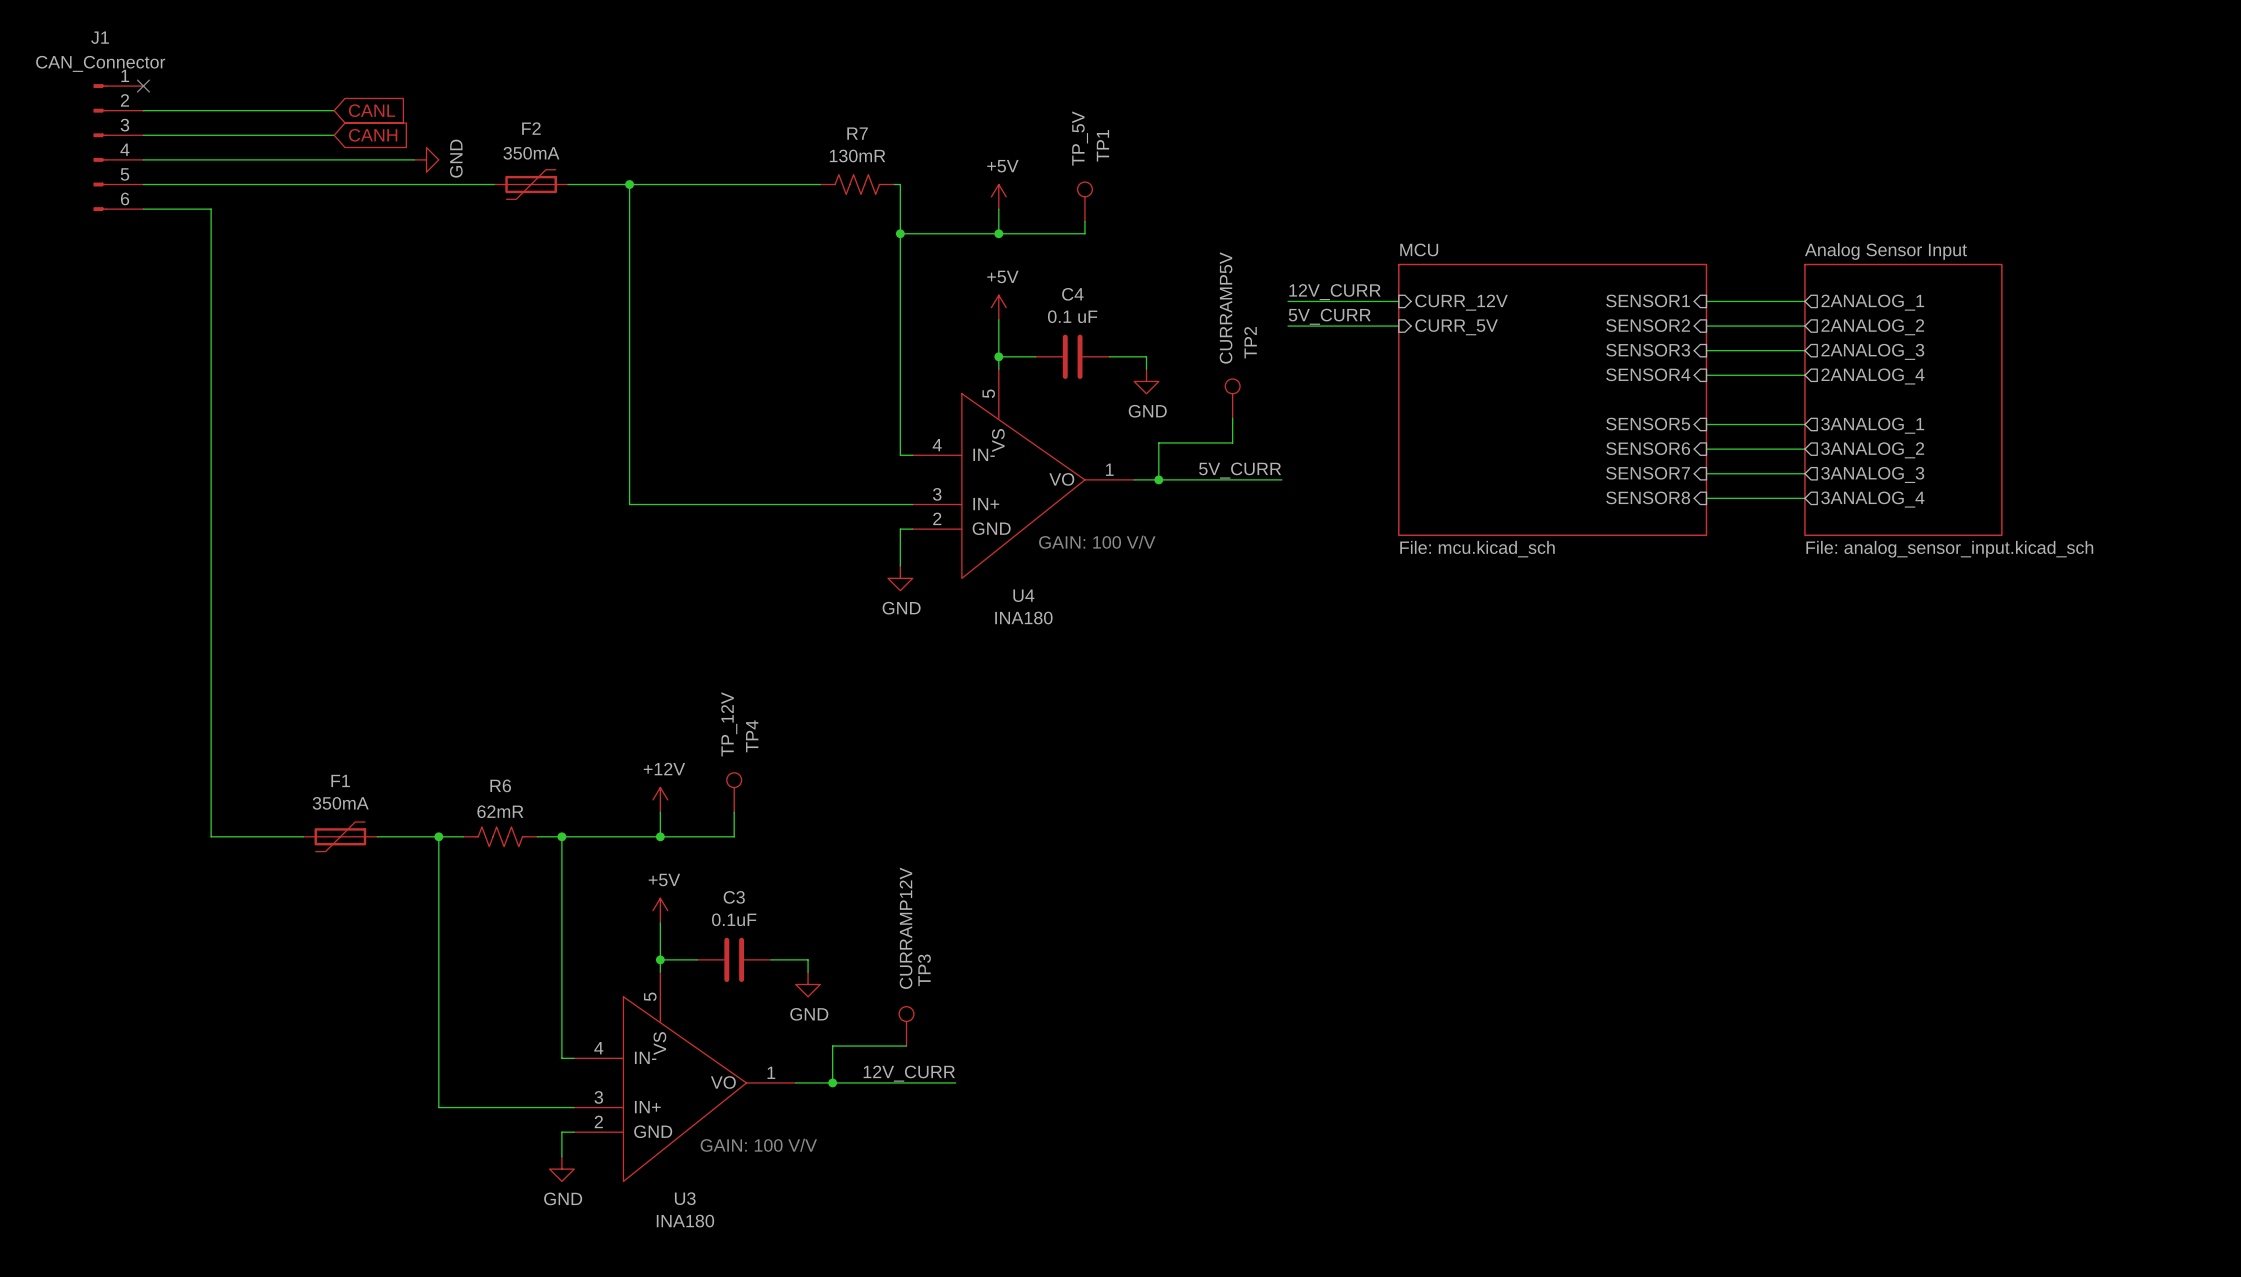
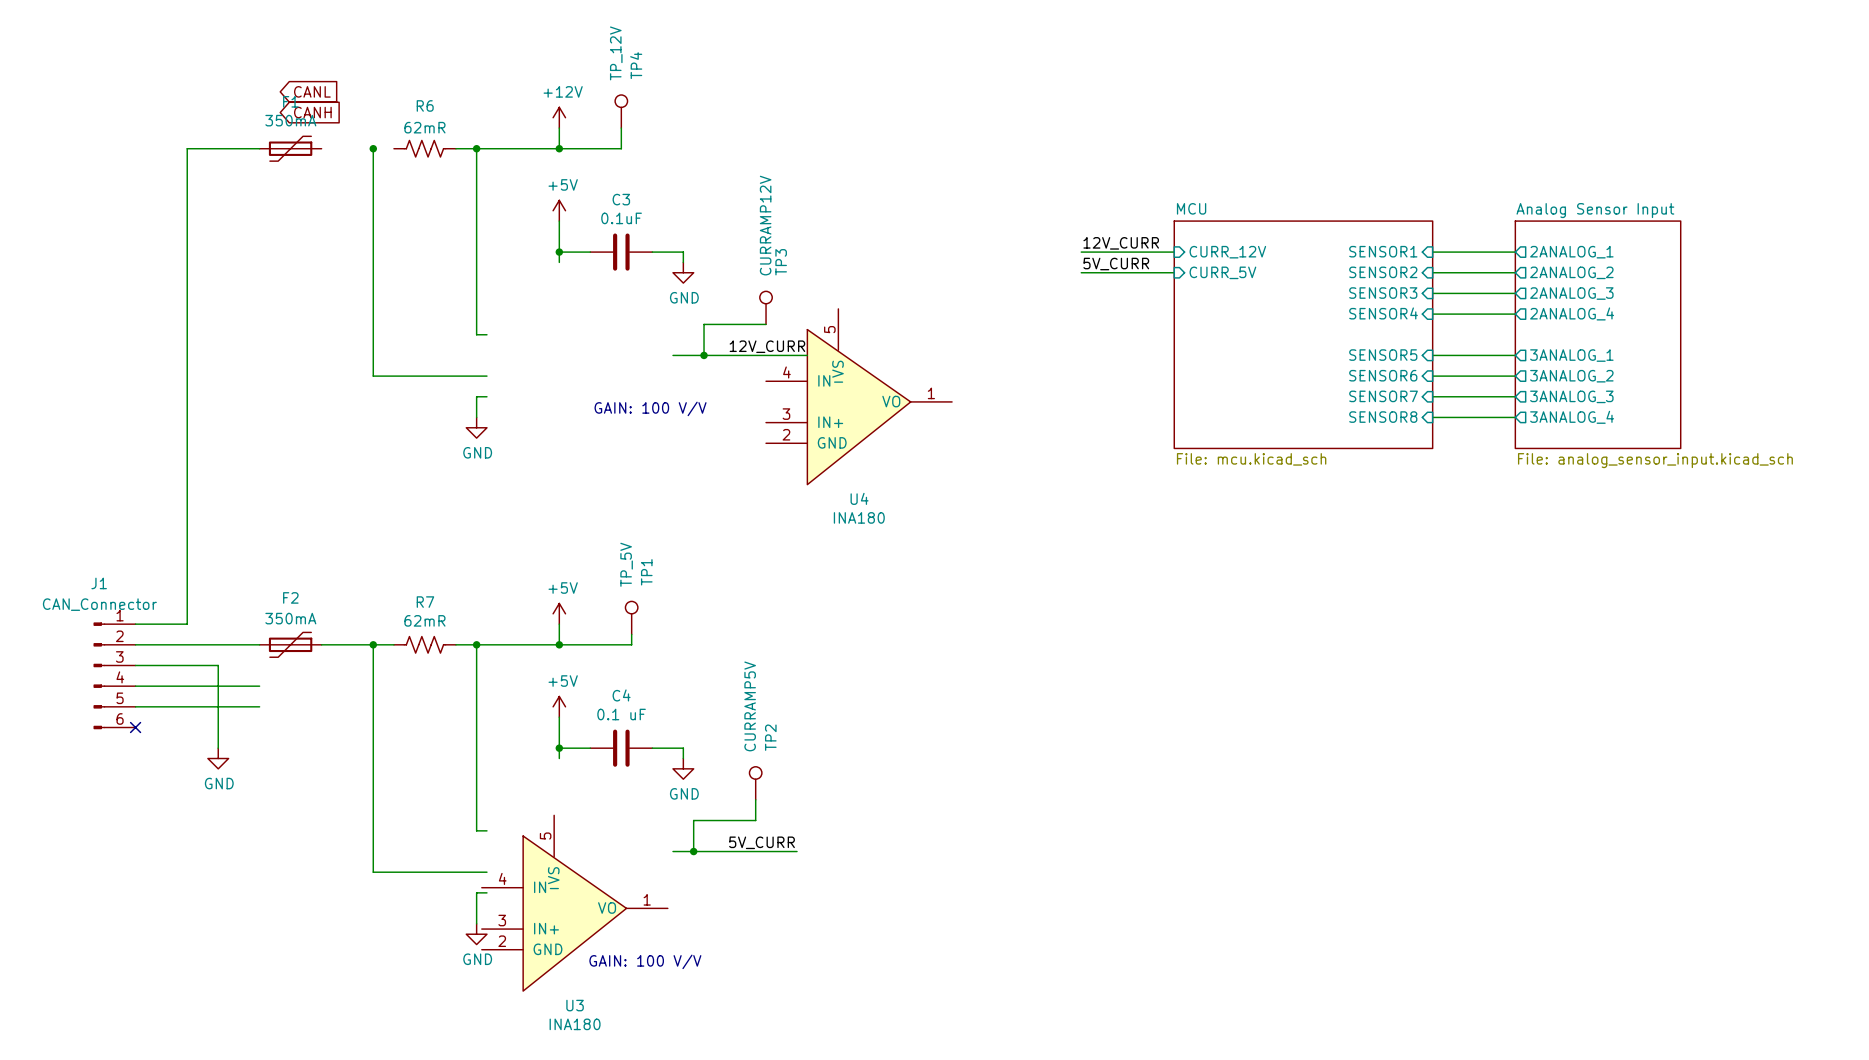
no-connect mark: (143, 86) -> none
wire: (143, 110) (334, 110) -> none
wire: (143, 135) (334, 135) -> none
power symbol: none -> +12V (559, 117)
J1 position: (118, 147) -> (114, 675)
wire: none -> (559, 128) (559, 148)
wire: none -> (621, 128) (621, 148) (455, 148)
R7 value: 130mR (857, 155) -> 62mR (424, 620)
wire: (143, 159) (414, 159) -> none
power symbol: GND (426, 159) -> none
wire: none -> (259, 148) (187, 148) (187, 624) (135, 624)
wire: none -> (373, 148) (373, 376) (486, 376)
junction: none -> (373, 148)
wire: none -> (476, 148) (476, 334) (486, 334)
junction: none -> (476, 148)
junction: none -> (559, 148)
wire: (143, 184) (494, 184) -> none
F2 position: (531, 184) -> (290, 644)
wire: (568, 184) (820, 184) -> none
wire: (629, 184) (629, 504) (912, 504) -> none
junction: (629, 184) -> none
R7 position: (857, 184) -> (424, 644)
wire: (894, 184) (900, 184) (900, 455) (912, 455) -> none
power symbol: +5V (998, 196) -> none
TP1 position: (1084, 201) -> (631, 617)
wire: (143, 209) (211, 209) (211, 836) (303, 836) -> none
wire: (998, 209) (998, 233) -> none
wire: (1084, 221) (1084, 233) (900, 233) -> none
junction: (900, 233) -> none
junction: (998, 233) -> none
power symbol: none -> +5V (559, 210)
wire: none -> (559, 221) (559, 262)
wire: none -> (559, 252) (590, 252)
junction: none -> (559, 252)
wire: none -> (652, 252) (683, 252) (683, 262)
power symbol: +5V (998, 307) -> none
wire: (998, 319) (998, 369) -> none
power symbol: none -> GND (683, 272)
wire: (998, 356) (1035, 356) -> none
junction: (998, 356) -> none
C4 position: (1072, 356) -> (621, 748)
wire: (1109, 356) (1146, 356) (1146, 369) -> none
power symbol: GND (1146, 381) -> none
wire: none -> (766, 324) (704, 324) (704, 355)
TP2 position: (1232, 398) -> (755, 783)
label: none -> 12V_CURR (767, 346)
wire: (1232, 418) (1232, 442) (1158, 442) (1158, 479) -> none
wire: none -> (673, 355) (807, 355)
junction: none -> (704, 355)
label: 5V_CURR (1240, 470) -> none
wire: none -> (486, 396) (476, 396) (476, 417)
wire: (1134, 479) (1281, 479) -> none
junction: (1158, 479) -> none
text: none -> GAIN: 100 V/V (650, 408)
power symbol: none -> GND (476, 427)
wire: (912, 529) (900, 529) (900, 566) -> none
text: GAIN: 100 V/V (1097, 542) -> none
power symbol: GND (900, 578) -> none
power symbol: none -> +5V (559, 613)
wire: none -> (631, 634) (631, 644) (455, 644)
wire: none -> (135, 644) (259, 644)
junction: none -> (373, 644)
junction: none -> (476, 644)
junction: none -> (559, 644)
TP4 position: (734, 792) -> (621, 111)
wire: none -> (135, 665) (218, 665) (218, 748)
power symbol: +12V (660, 799) -> none
wire: (660, 812) (660, 836) -> (559, 624) (559, 644)
wire: (734, 812) (734, 836) (537, 836) -> none
wire: none -> (135, 686) (259, 686)
F1 position: (340, 836) -> (290, 148)
wire: (377, 836) (463, 836) -> (321, 644) (393, 644)
wire: (438, 836) (438, 1107) (574, 1107) -> (373, 644) (373, 872) (486, 872)
junction: (438, 836) -> none
R6 position: (500, 836) -> (424, 148)
wire: (561, 836) (561, 1058) (574, 1058) -> (476, 644) (476, 830) (486, 830)
junction: (561, 836) -> none
junction: (660, 836) -> none
wire: none -> (135, 706) (259, 706)
no-connect mark: none -> (135, 727)
junction: none -> (559, 748)
power symbol: none -> GND (218, 758)
power symbol position: +5V (660, 910) -> +5V (559, 706)
wire: (660, 922) (660, 972) -> (559, 717) (559, 758)
wire: none -> (755, 799) (755, 820) (693, 820) (693, 851)
wire: (660, 959) (697, 959) -> (559, 748) (590, 748)
junction: (660, 959) -> none
C3 position: (734, 959) -> (621, 252)
wire: (771, 959) (808, 959) (808, 972) -> (652, 748) (683, 748) (683, 758)
power symbol position: GND (808, 984) -> GND (683, 768)
label: none -> 5V_CURR (762, 842)
wire: none -> (673, 851) (797, 851)
junction: none -> (693, 851)
TP3 position: (906, 1026) -> (766, 307)
wire: (906, 1046) (832, 1046) (832, 1082) -> none
wire: none -> (486, 892) (476, 892) (476, 923)
label: 12V_CURR (909, 1073) -> none
wire: (795, 1082) (955, 1082) -> none
junction: (832, 1082) -> none
wire: (574, 1132) (561, 1132) (561, 1156) -> none
power symbol position: GND (561, 1169) -> GND (476, 934)

